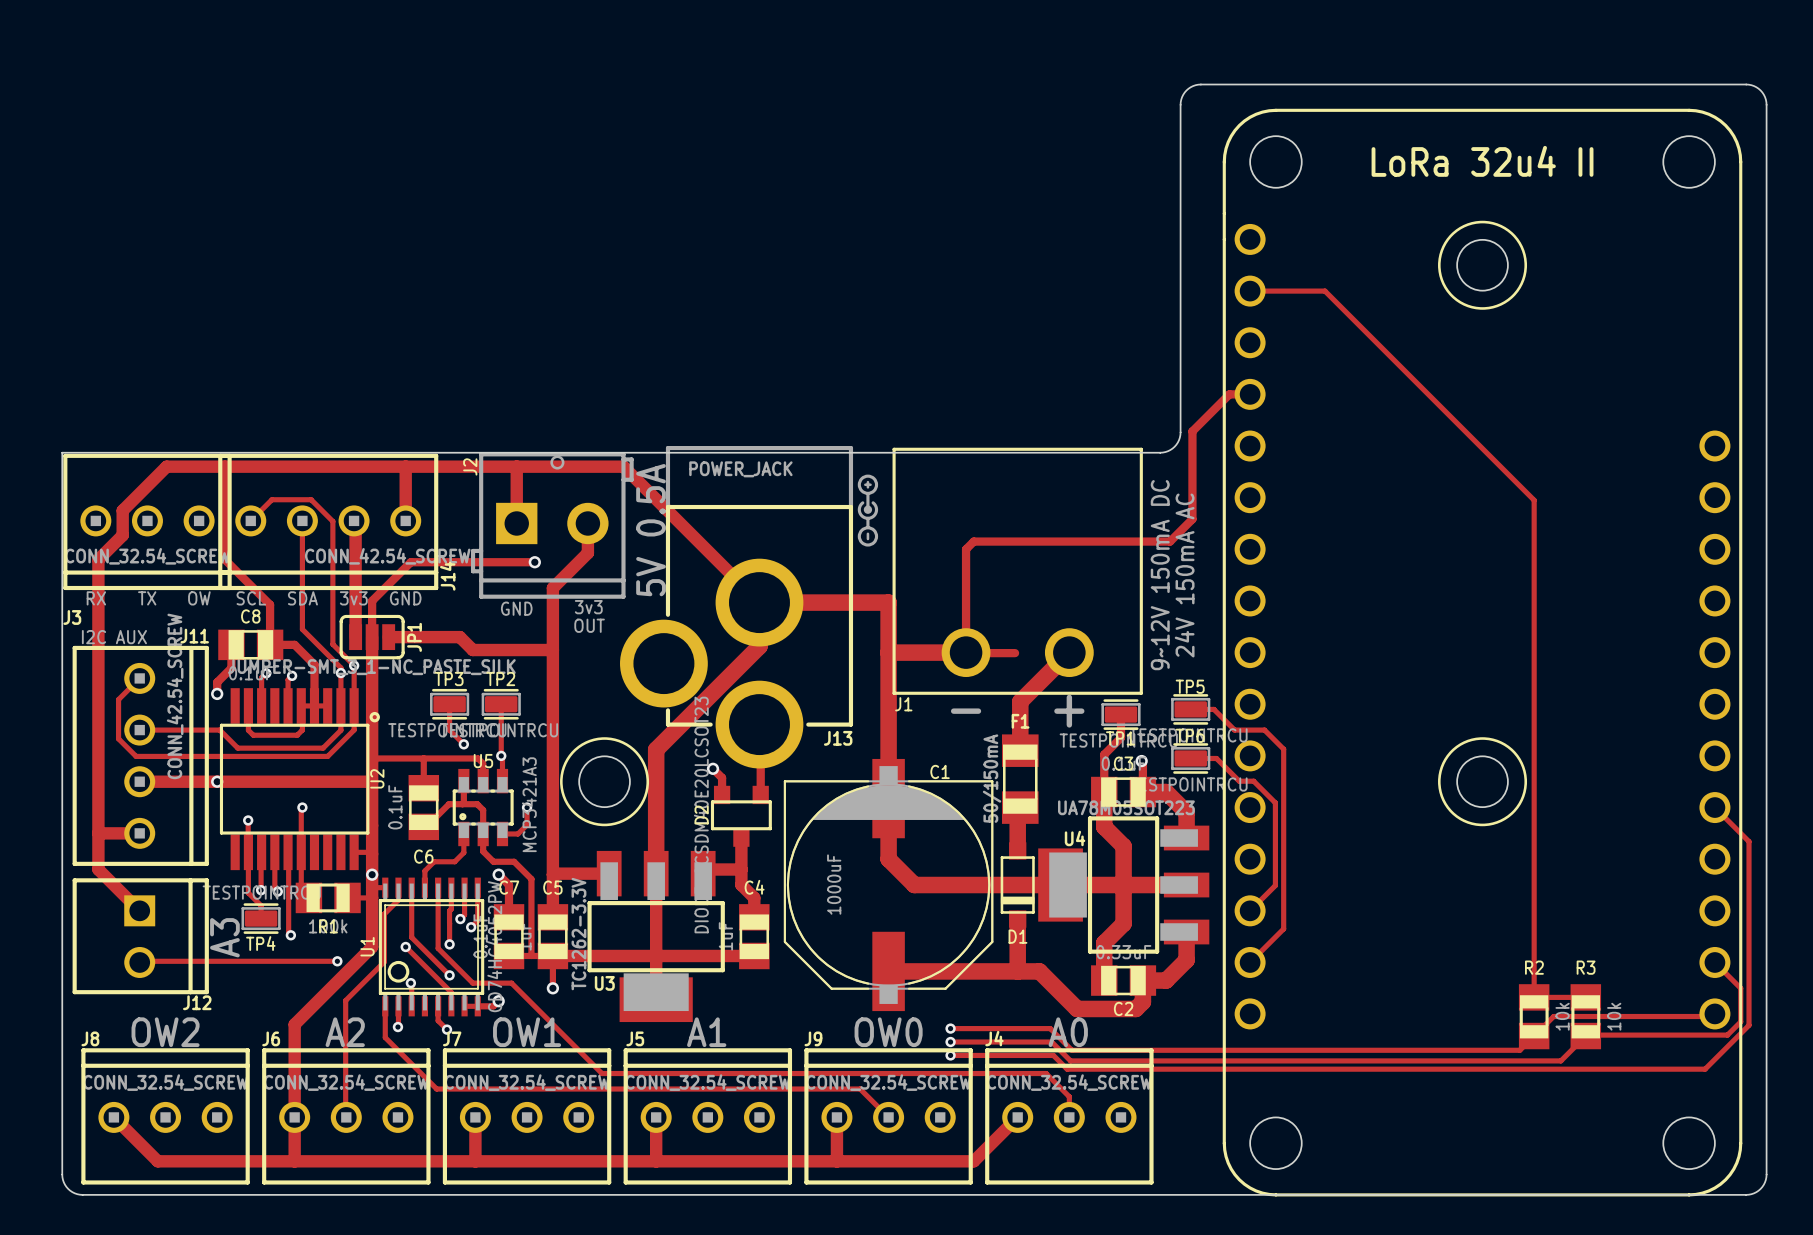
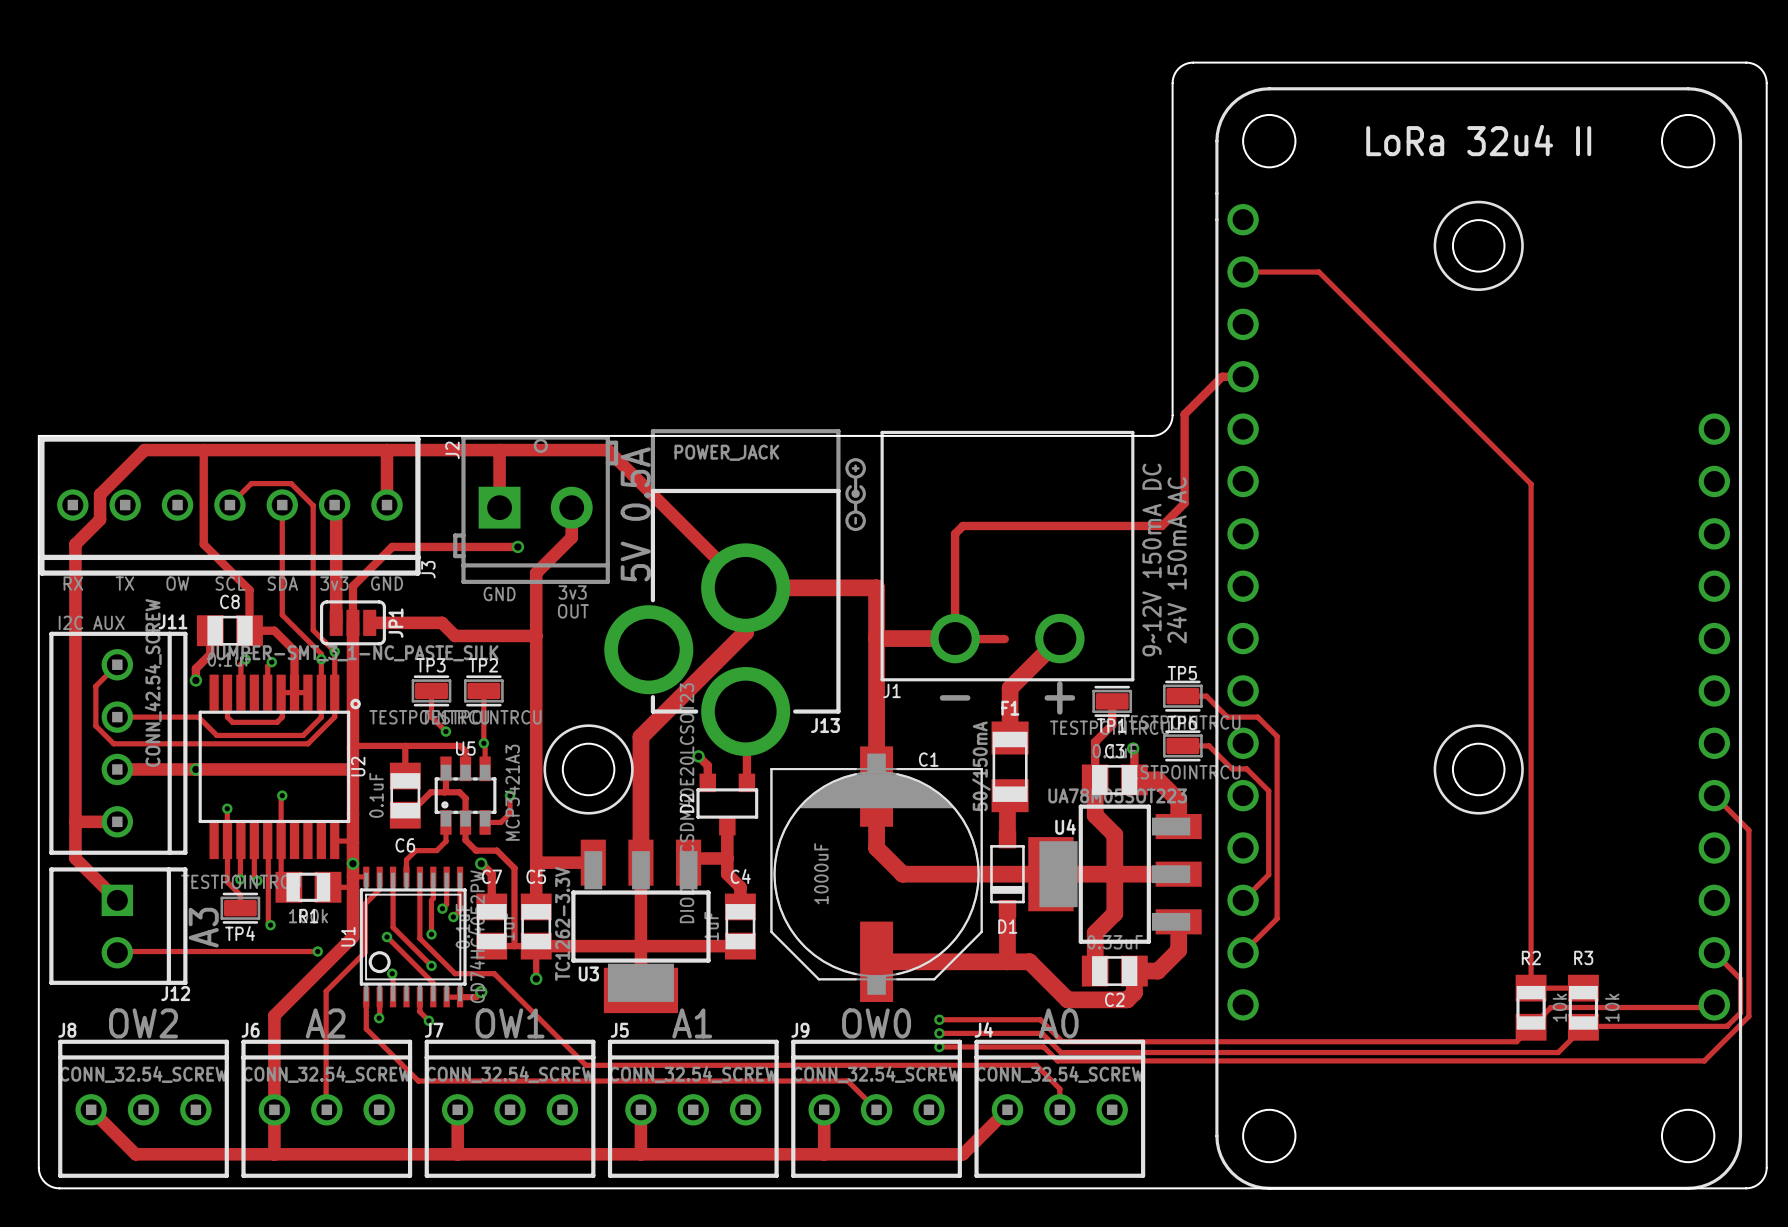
J3 footprint: [63, 453, 232, 591] -> [39, 436, 421, 576]
J14: CONN_42.54_SCREW (328, 521) -> none
J3 value: CONN_32.54_SCREW (147, 556) -> none
J3 name position: J3 (72, 617) -> J3 (428, 569)

